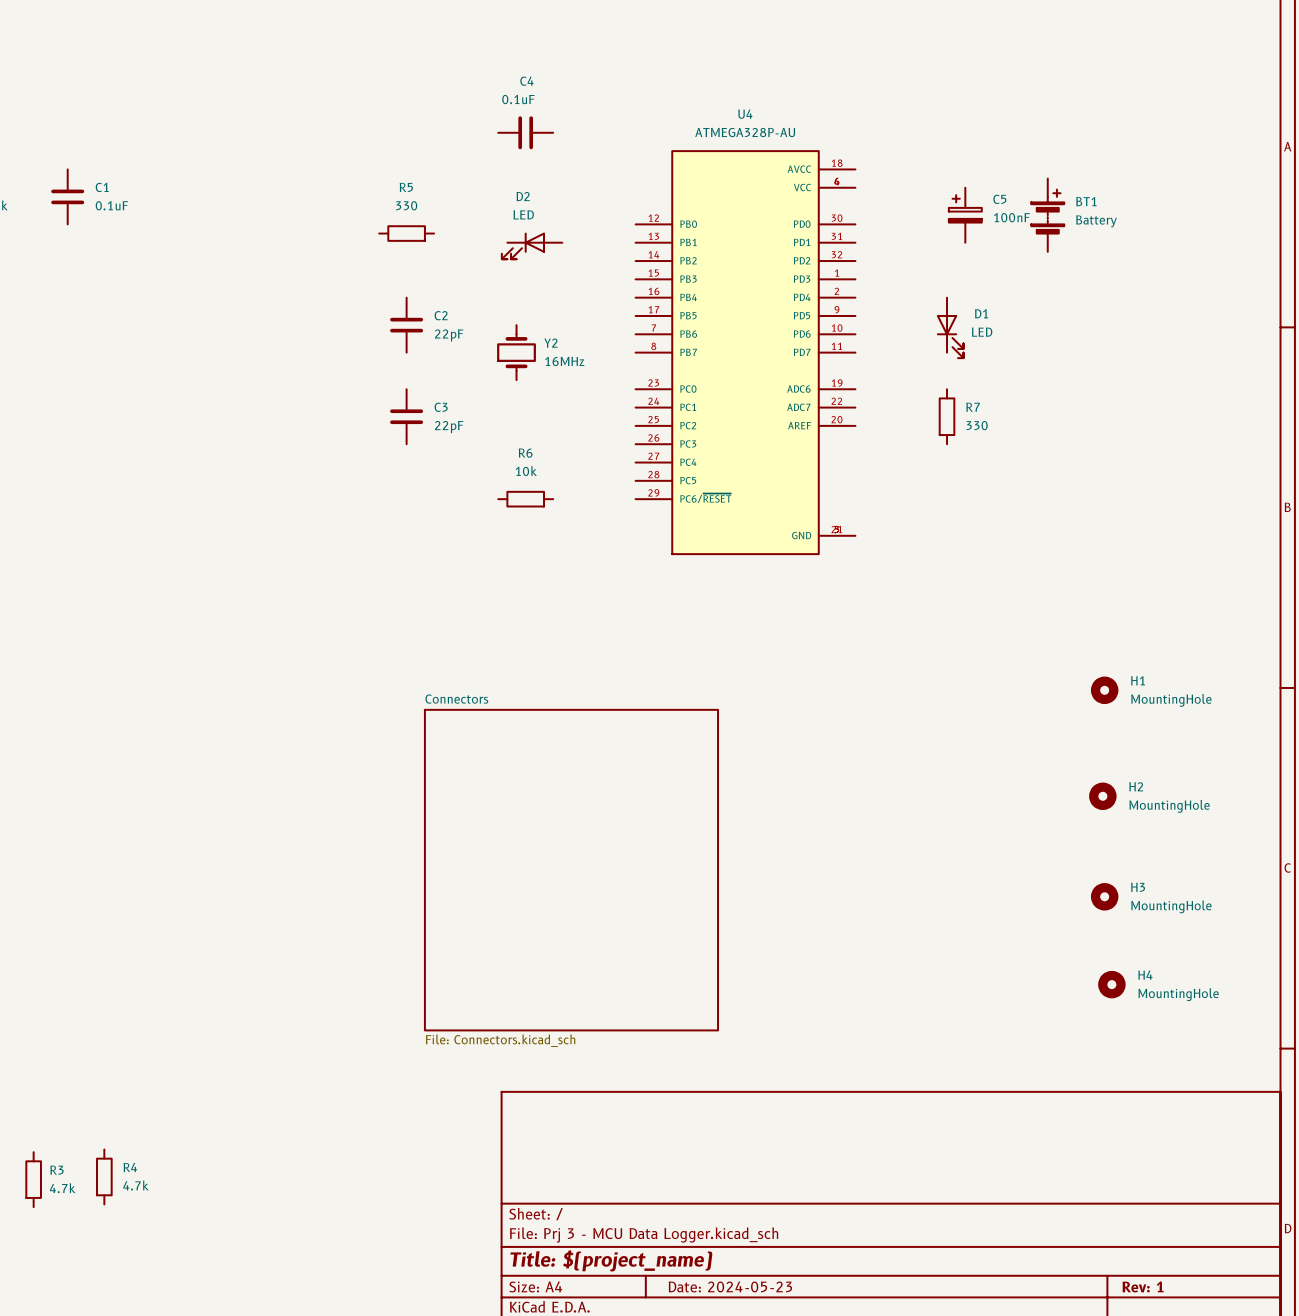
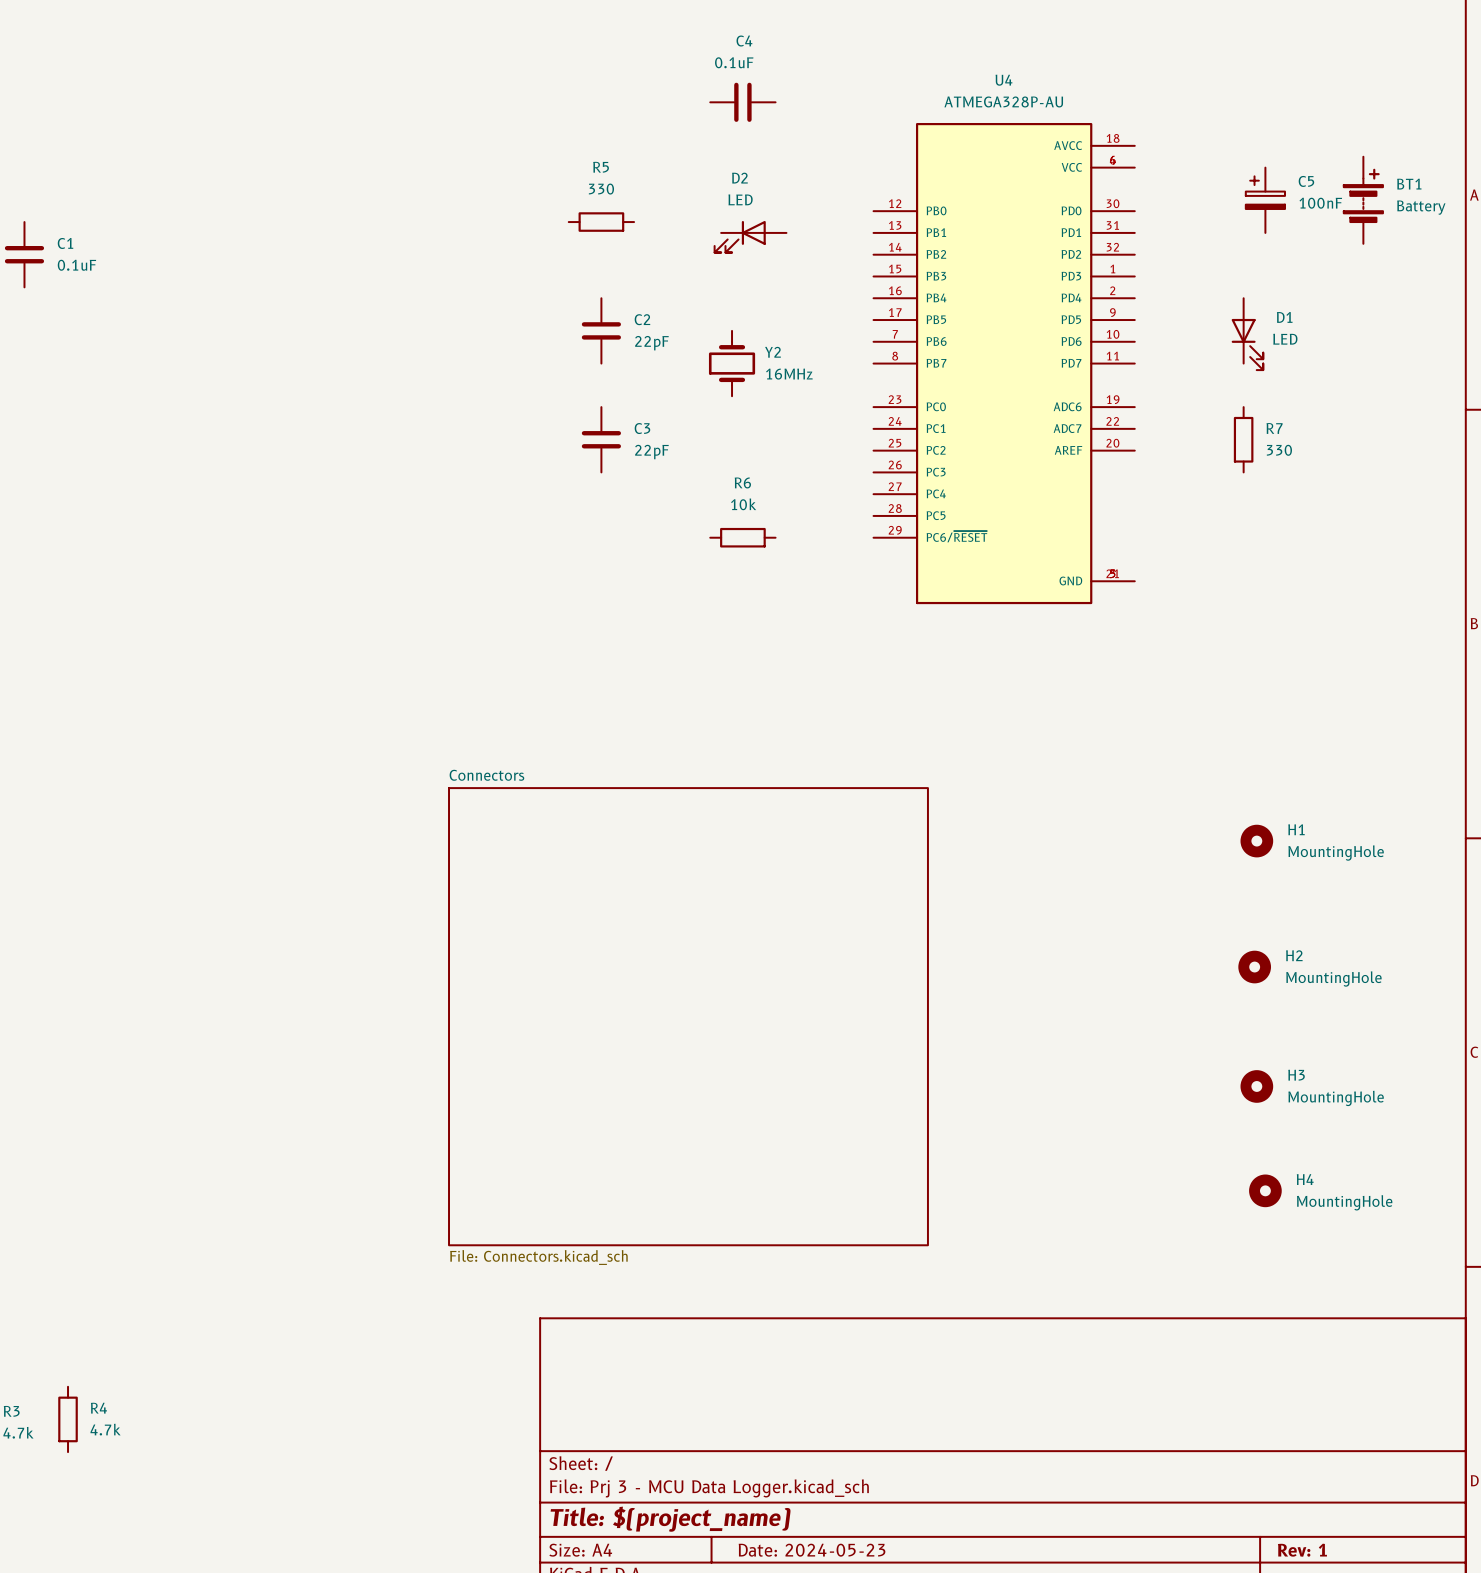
C4 position: (525, 132) -> (742, 102)
C5 position: (965, 215) -> (1265, 200)
BT1 position: (1047, 215) -> (1363, 200)
R5 position: (406, 233) -> (601, 222)
D2 position: (532, 245) -> (750, 236)
C2 position: (406, 325) -> (601, 330)
D1 position: (950, 327) -> (1247, 334)
Y2 position: (516, 352) -> (732, 363)
U4 position: (745, 352) -> (1004, 363)
C3 position: (406, 416) -> (601, 439)
R7 position: (947, 416) -> (1243, 439)
R6 position: (525, 499) -> (742, 537)
sheet Connectors: none -> File: Connectors.kicad_sch (688, 1016)
sheet Connectors: File: Connectors.kicad_sch (571, 870) -> none

